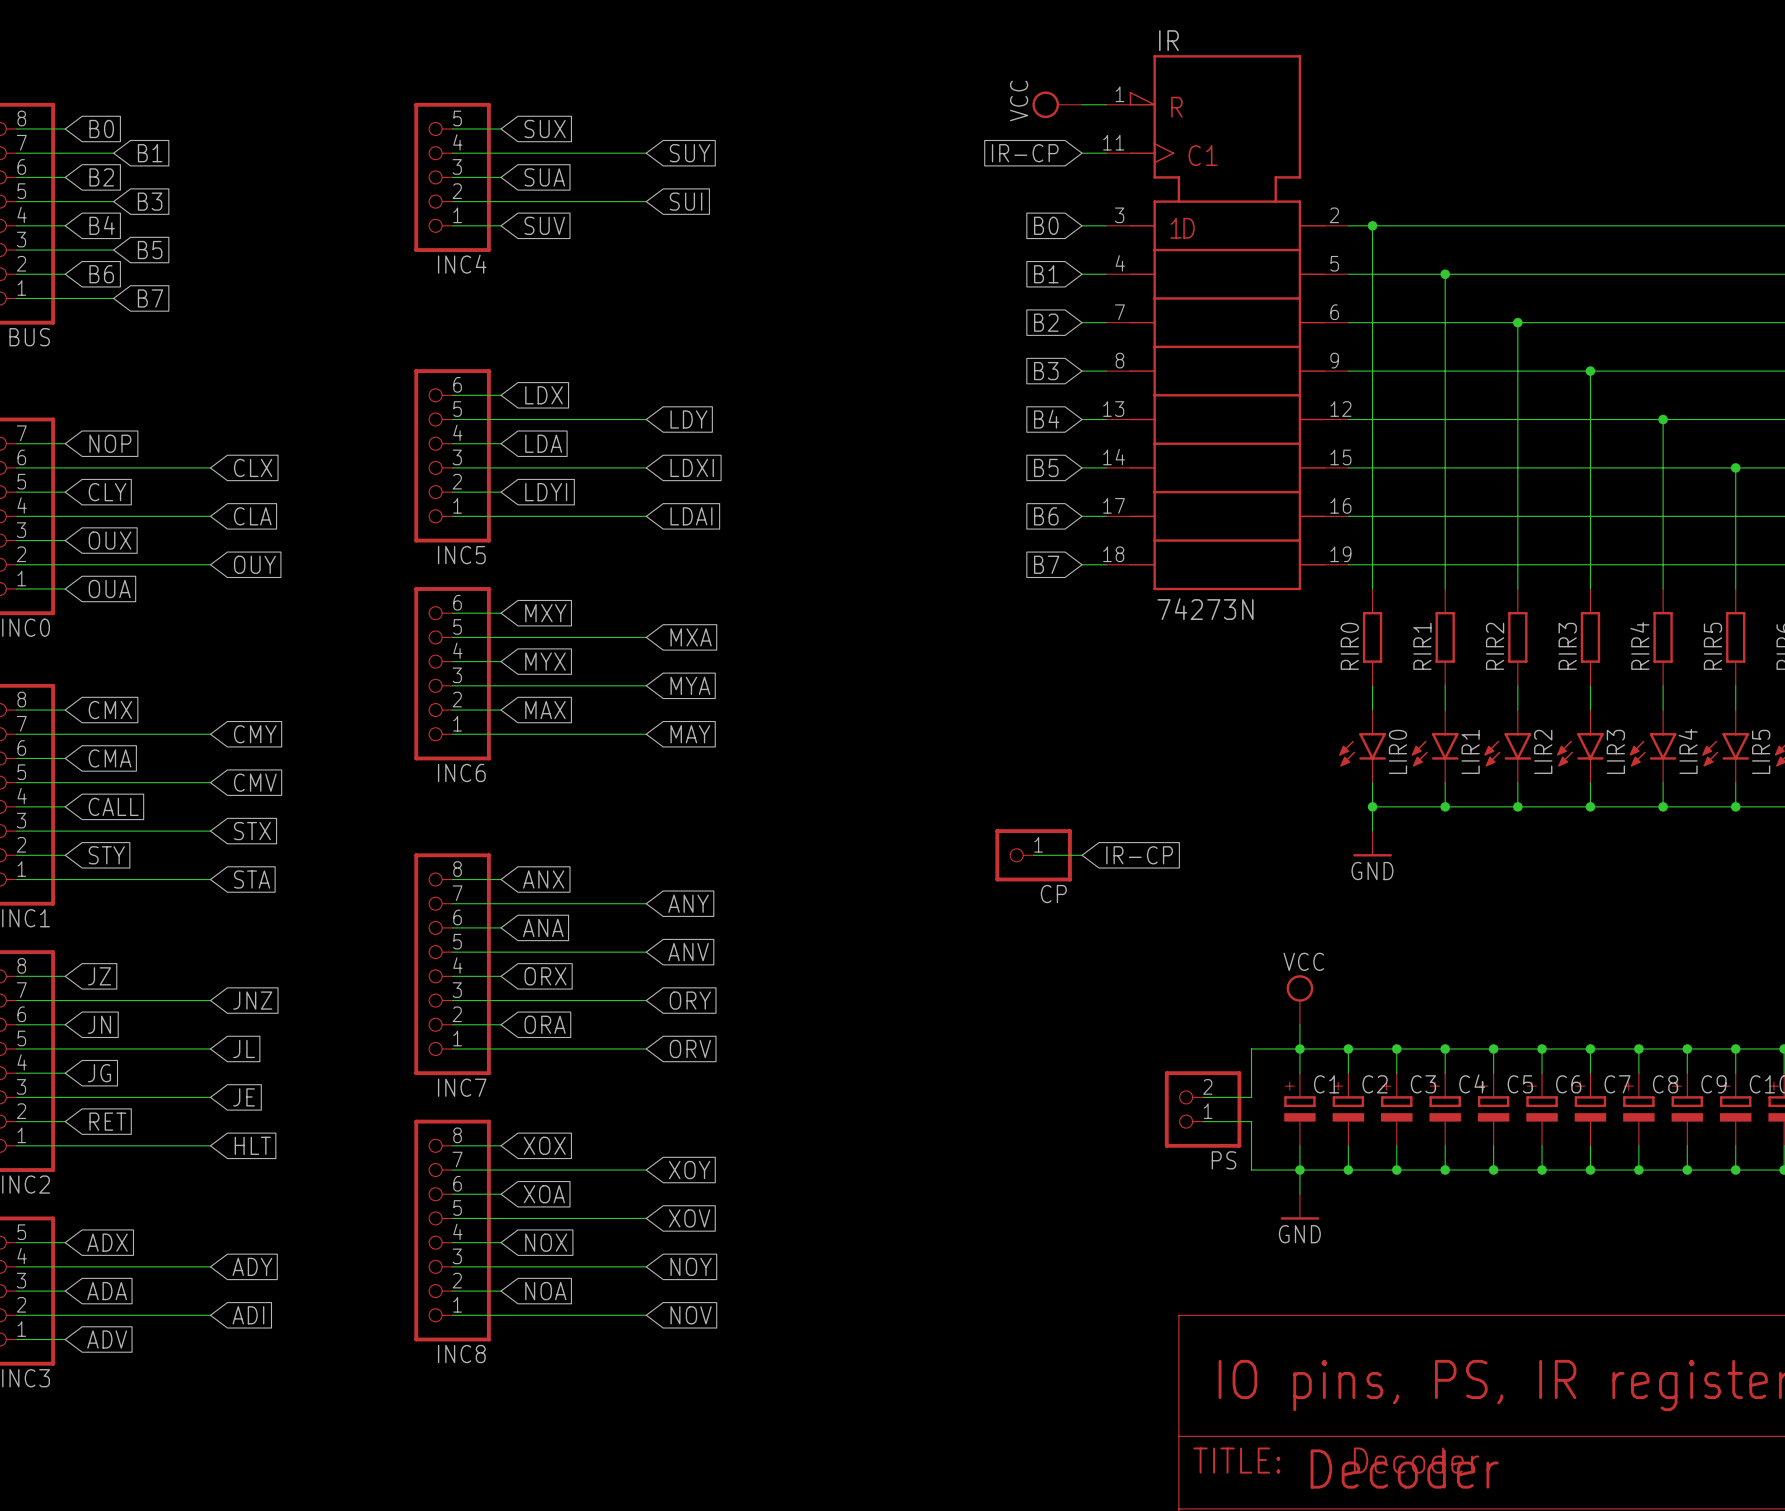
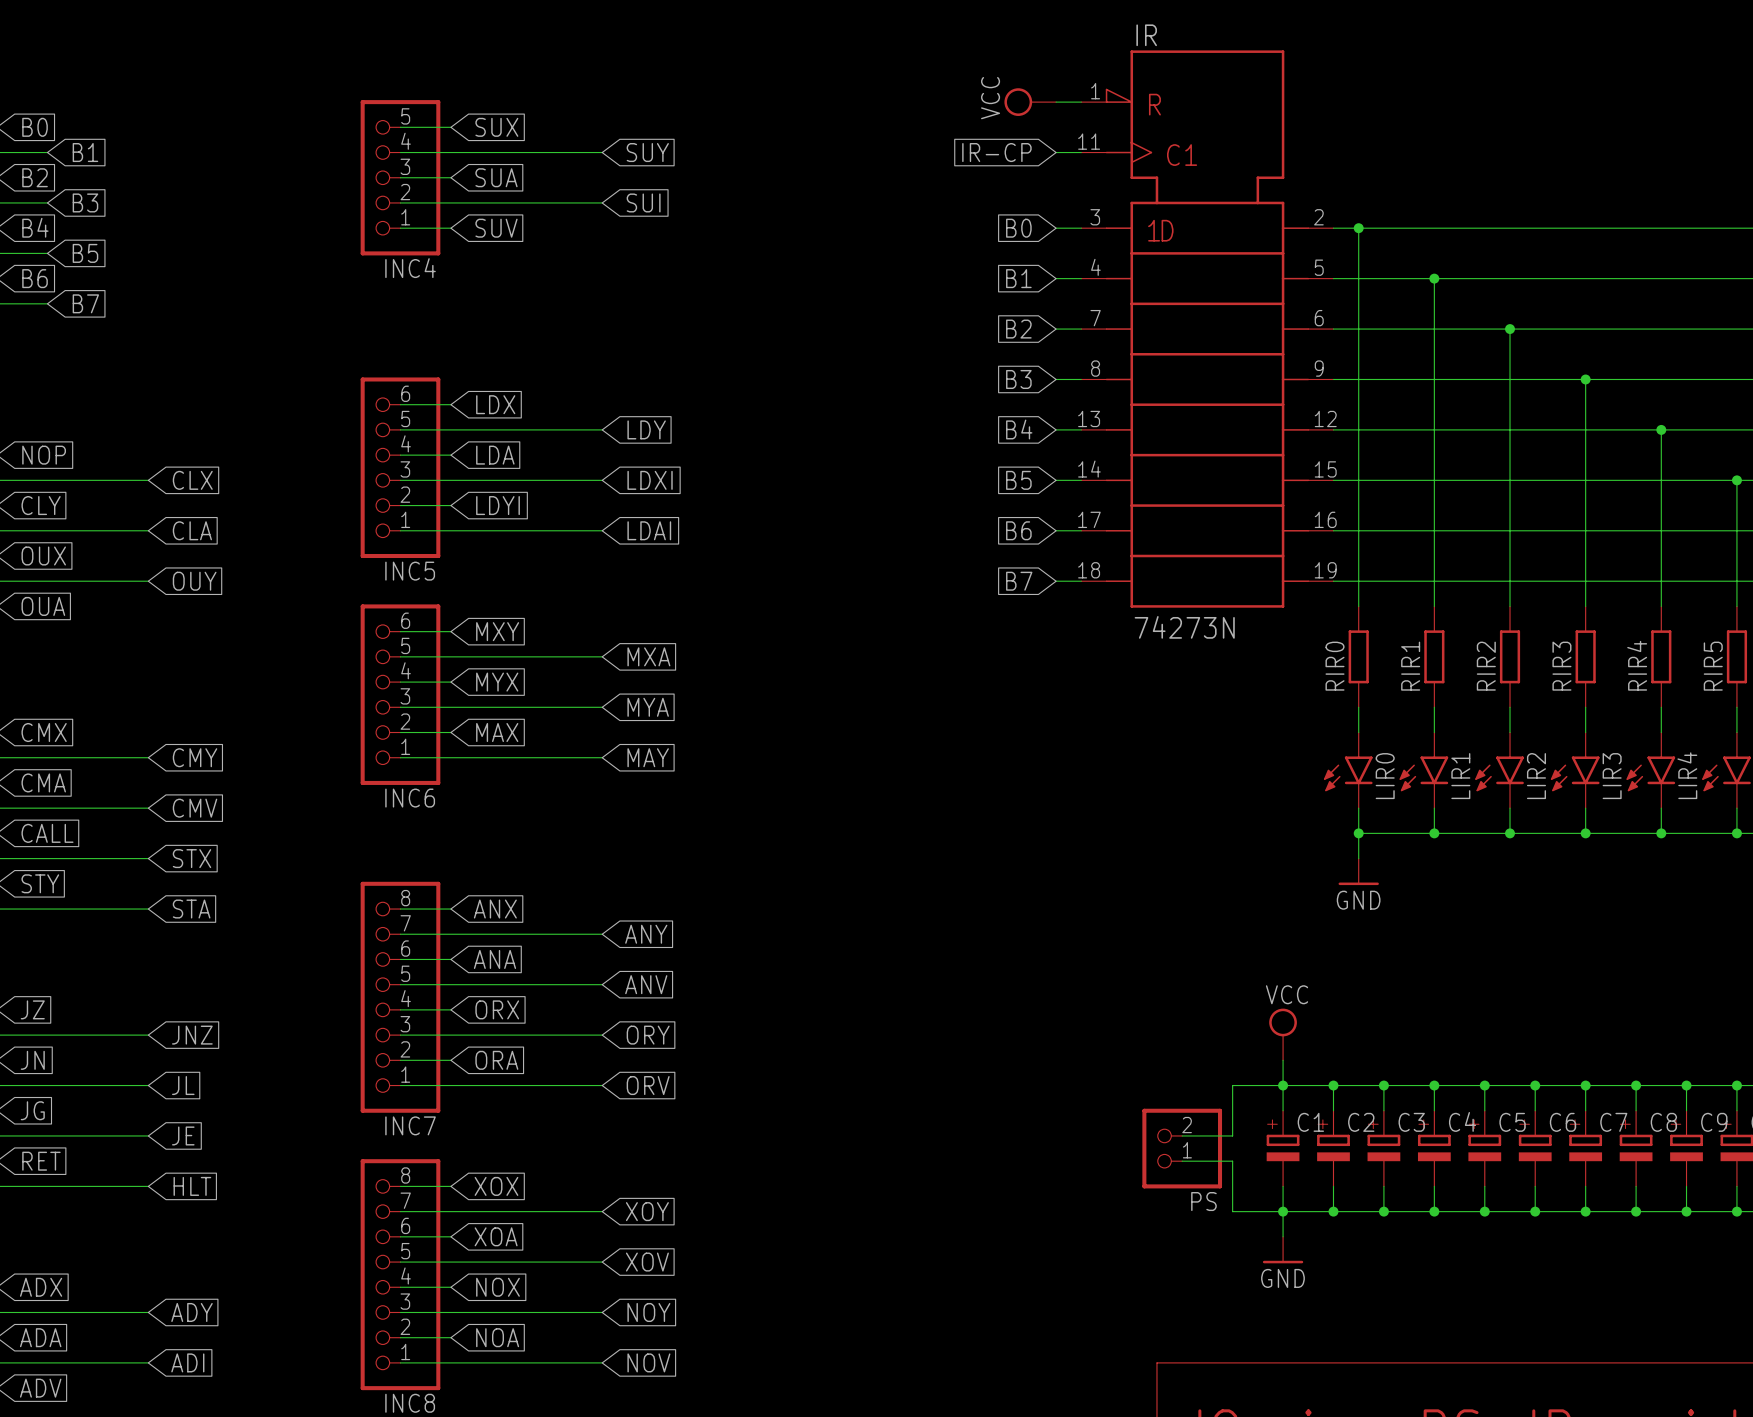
wire: (1033, 855) (1082, 855) -> none
CP: (1033, 855) -> none
global label: IR-CP (1139, 855) -> none

